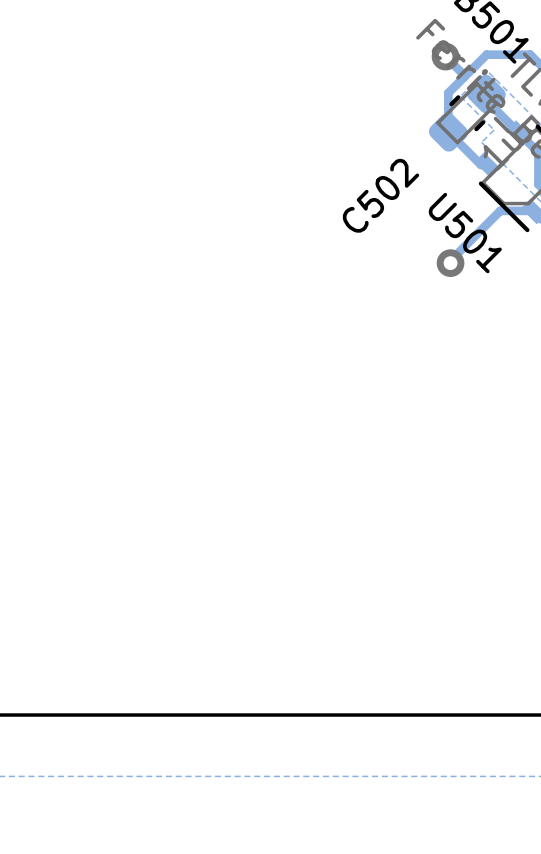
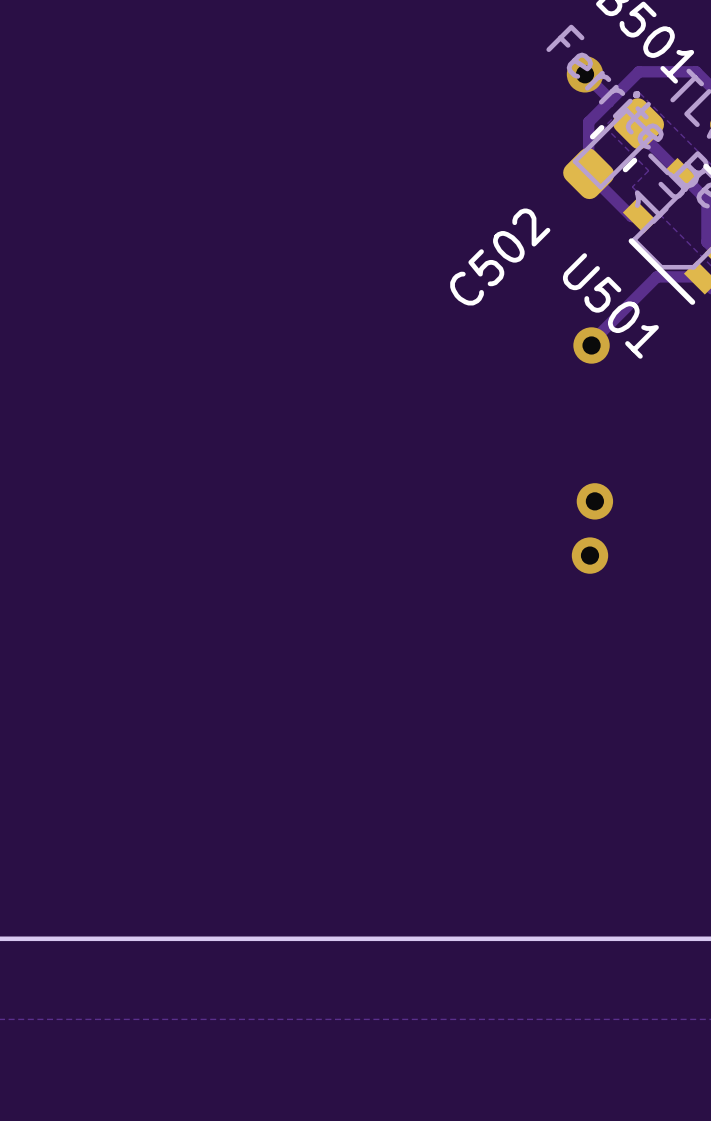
via: none -> (594, 501)
via: none -> (589, 555)

